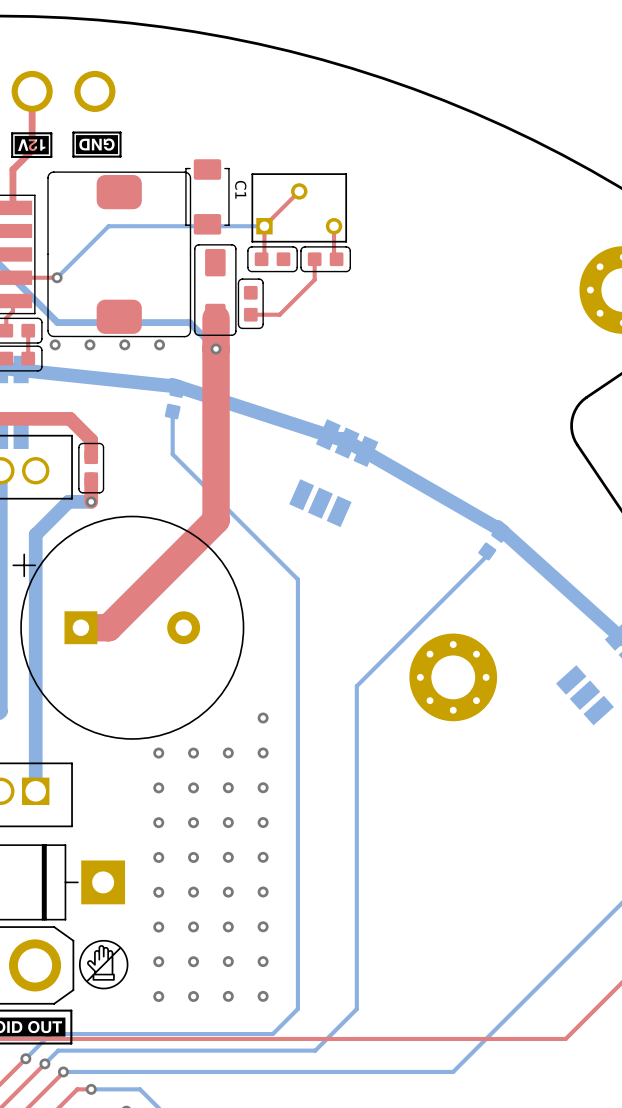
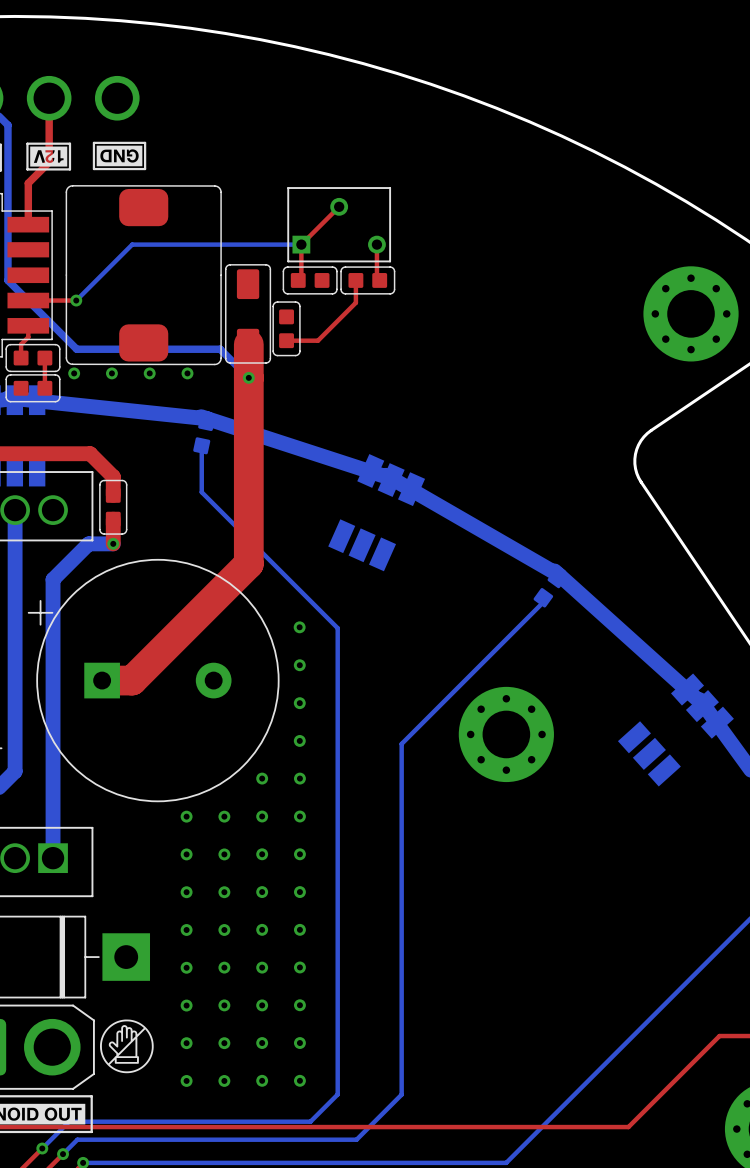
C1: (207, 196) -> none
via: none -> (299, 627)
via: none -> (299, 665)
via: none -> (299, 703)
via: none -> (299, 740)
via: none -> (262, 778)

